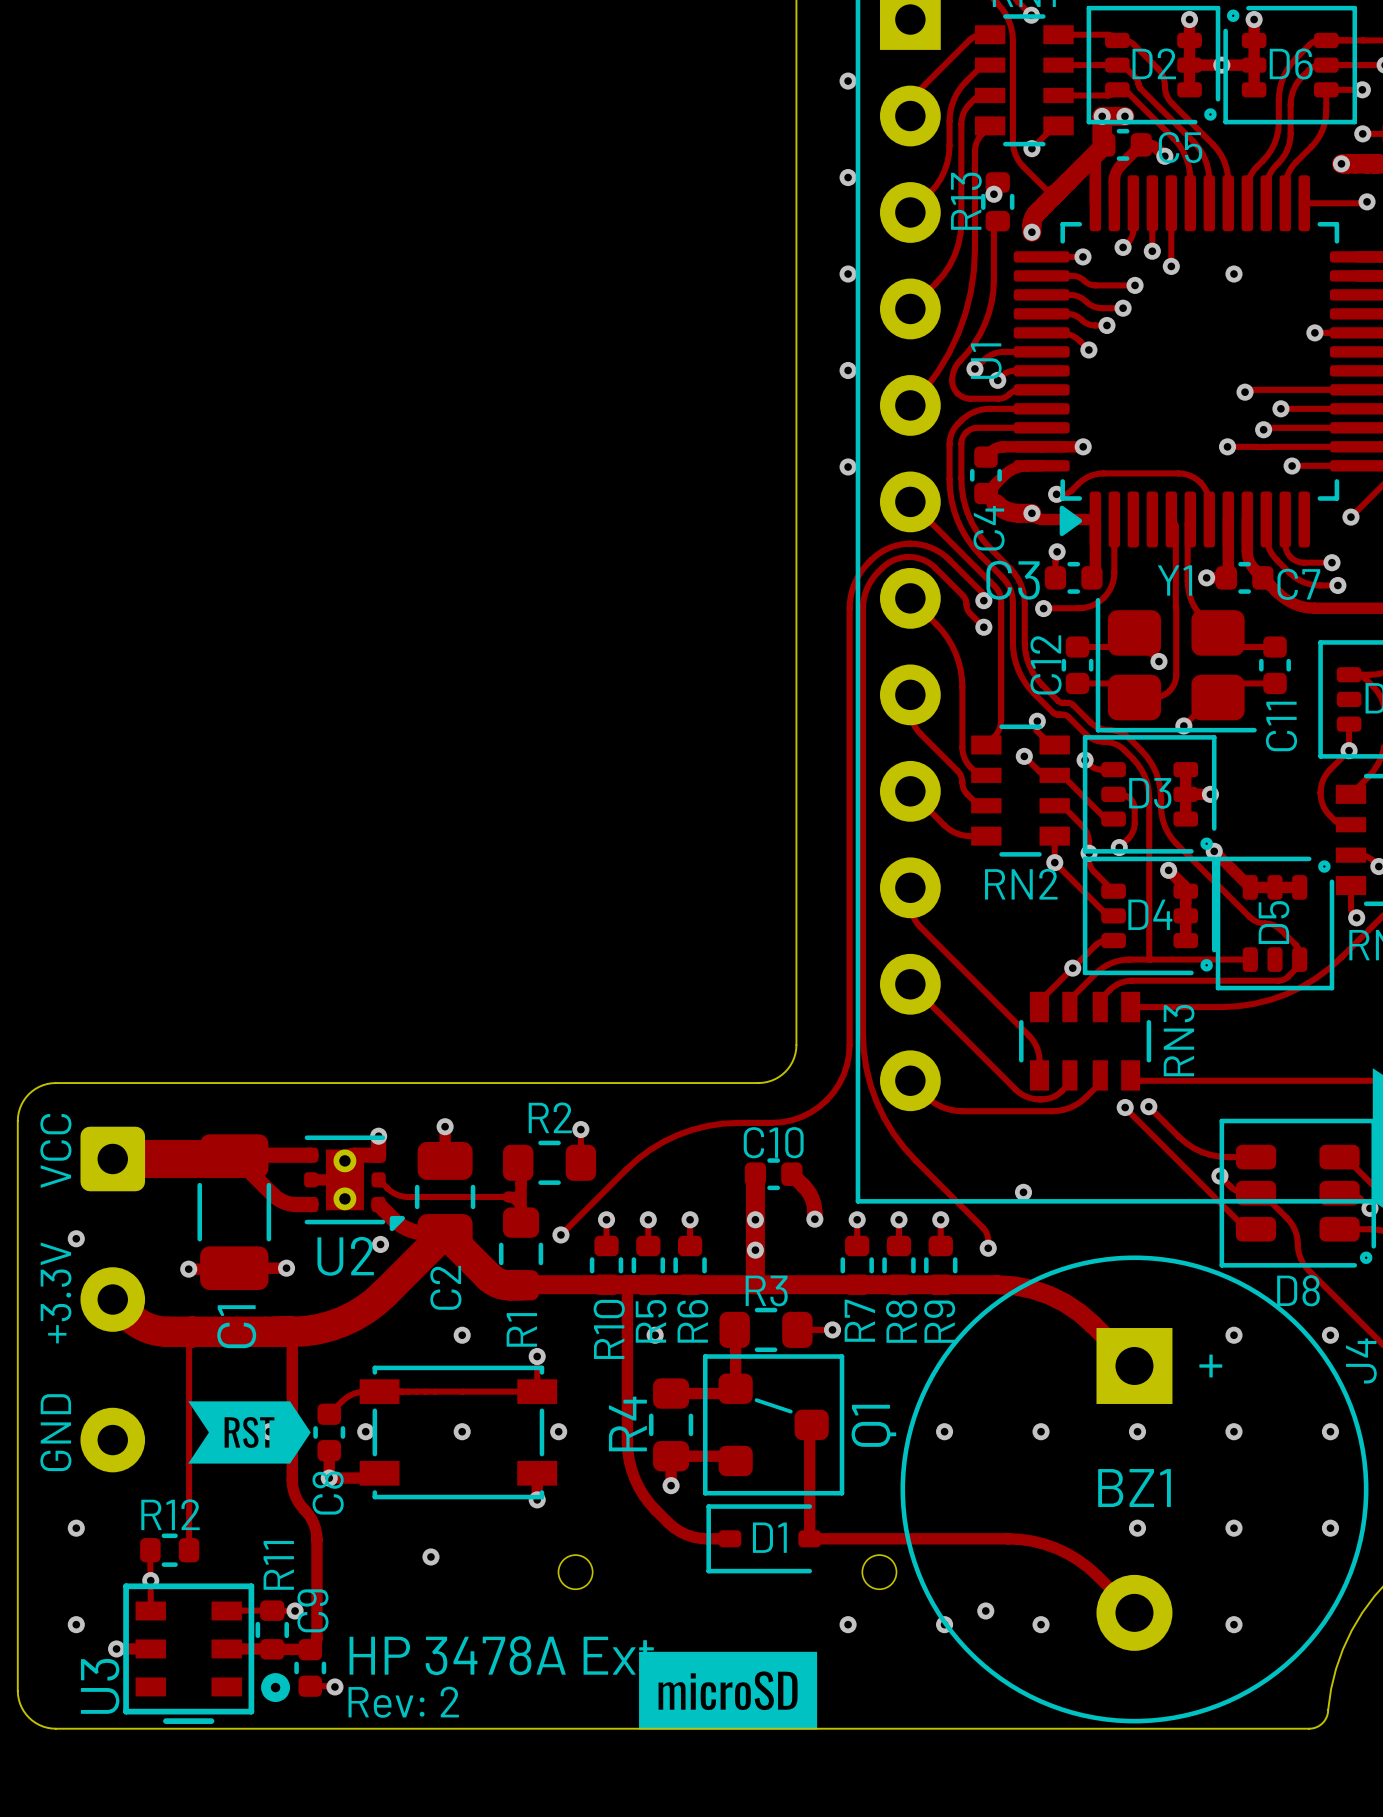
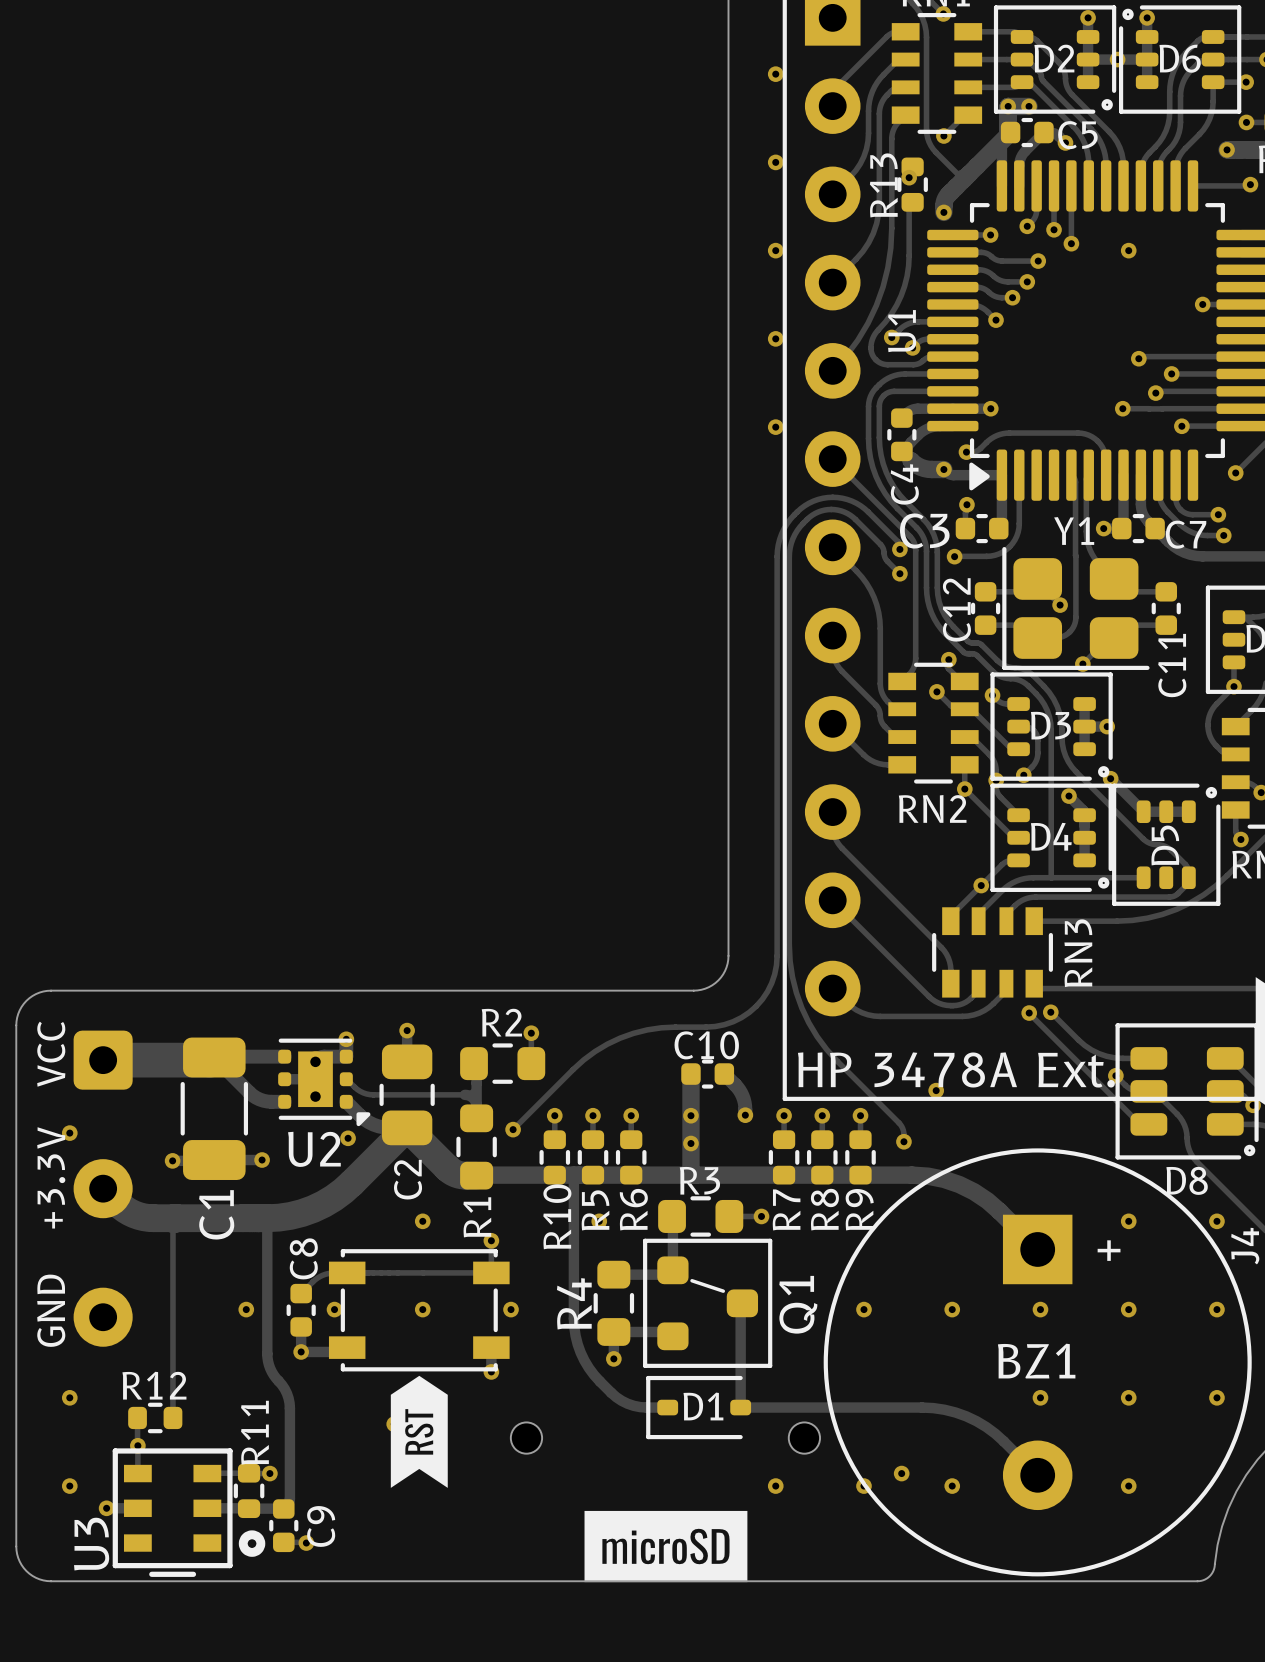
drawing: [188, 1401, 311, 1464] -> none
C8 name position: C8 (328, 1493) -> C8 (303, 1258)
drawing: none -> [390, 1375, 448, 1488]
C9 name position: C9 (312, 1610) -> C9 (321, 1526)
text position: HP 3478A Ext. (508, 1655) -> HP 3478A Ext. (956, 1069)
text: Rev: 2 (403, 1702) -> none

